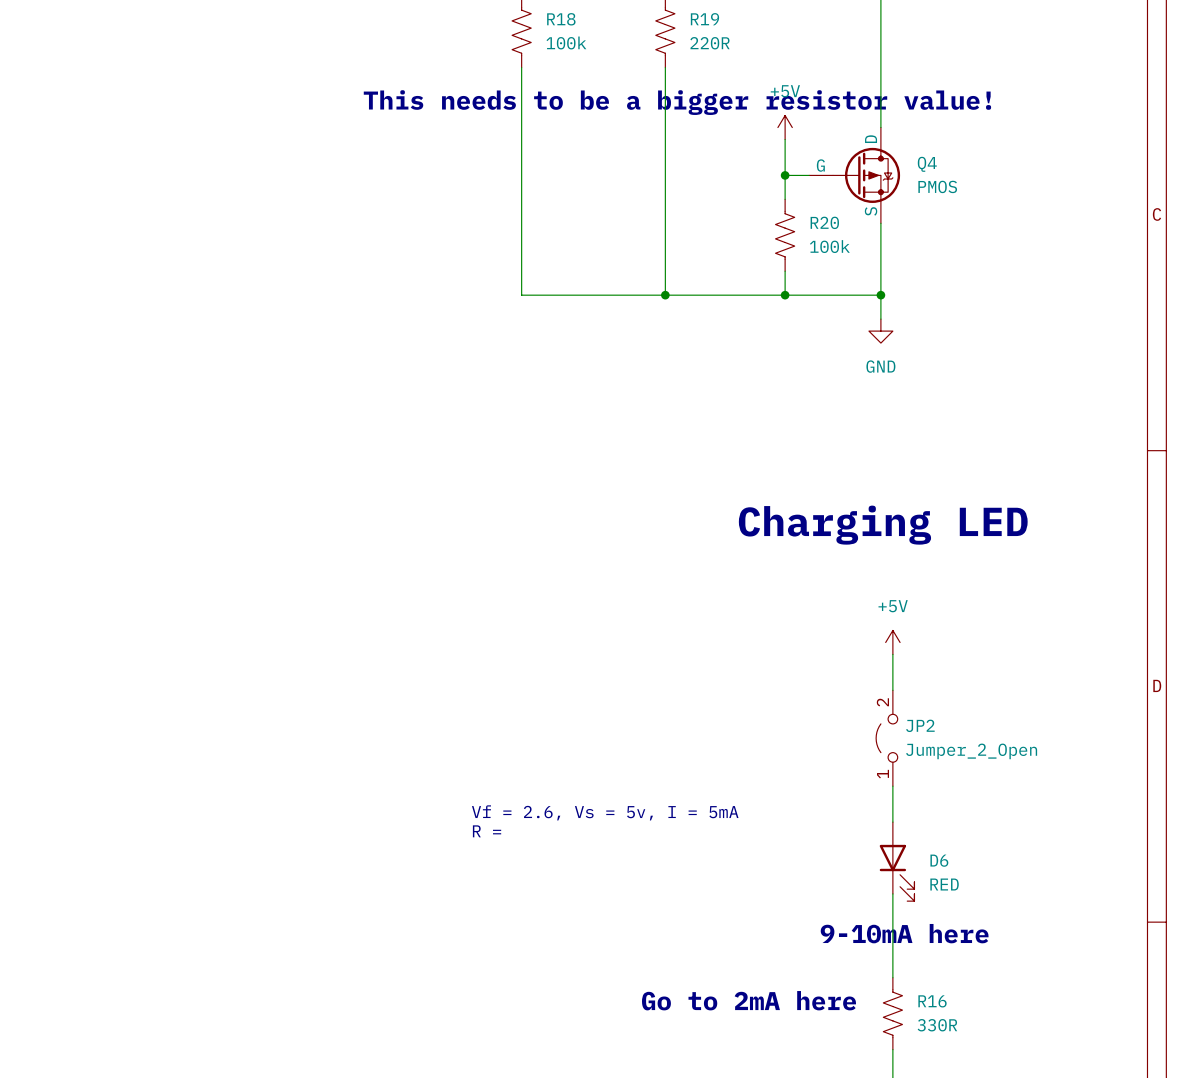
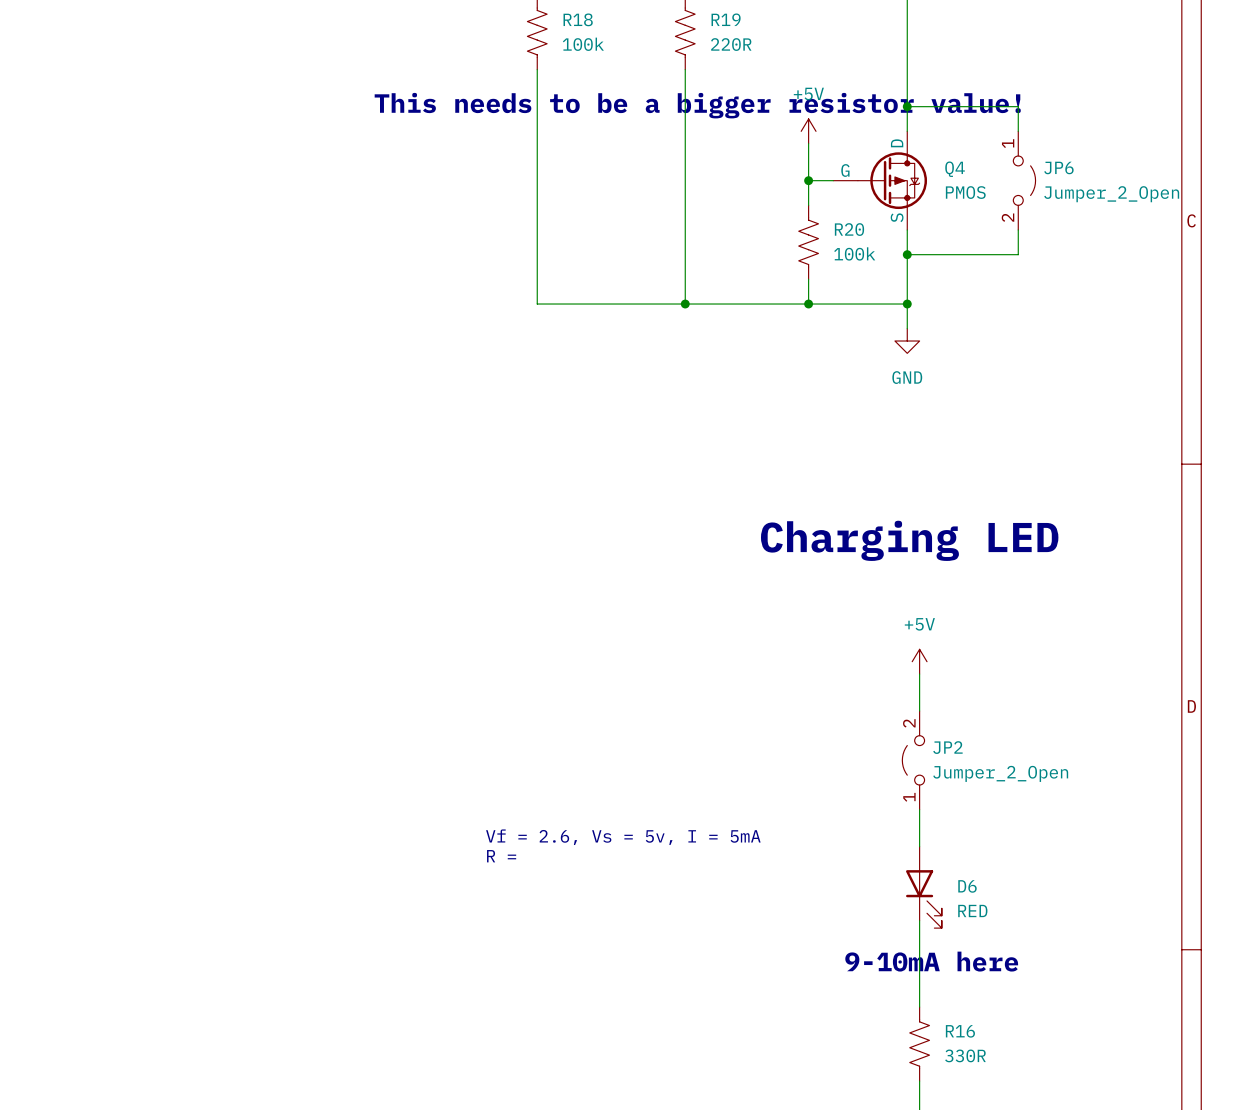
wire: none -> (907, 106) (1018, 106) (1018, 131)
junction: none -> (907, 106)
JP6: none -> Jumper_2_Open (1024, 180)
wire: none -> (1018, 230) (1018, 254) (907, 254)
junction: none -> (907, 254)
text: Go to 2mA here (748, 1000) -> none

